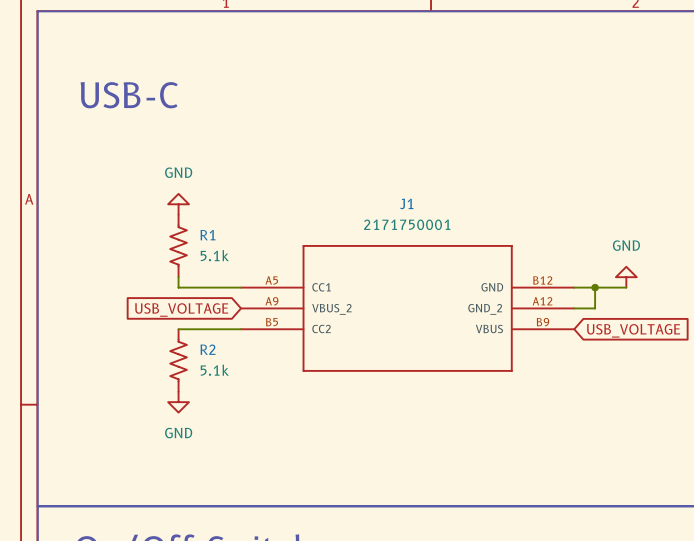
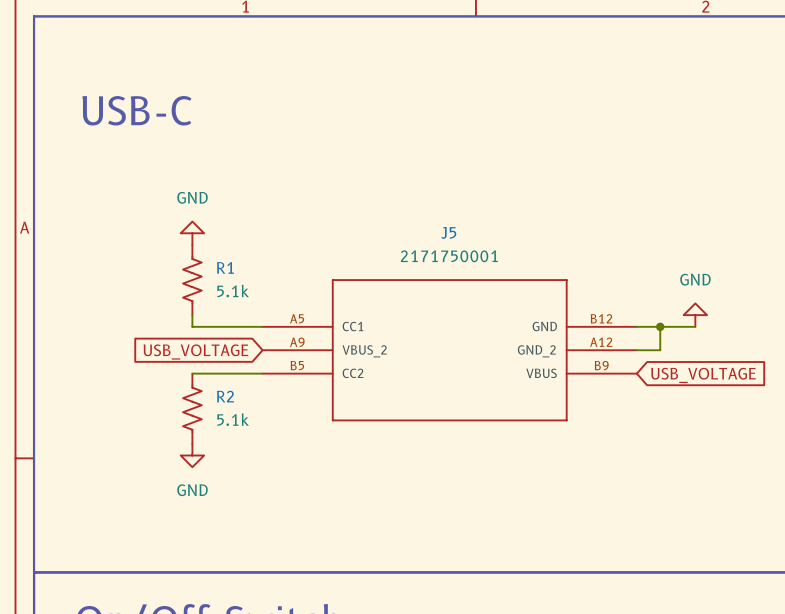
J1 name: J1 (406, 203) -> J5 (448, 232)

